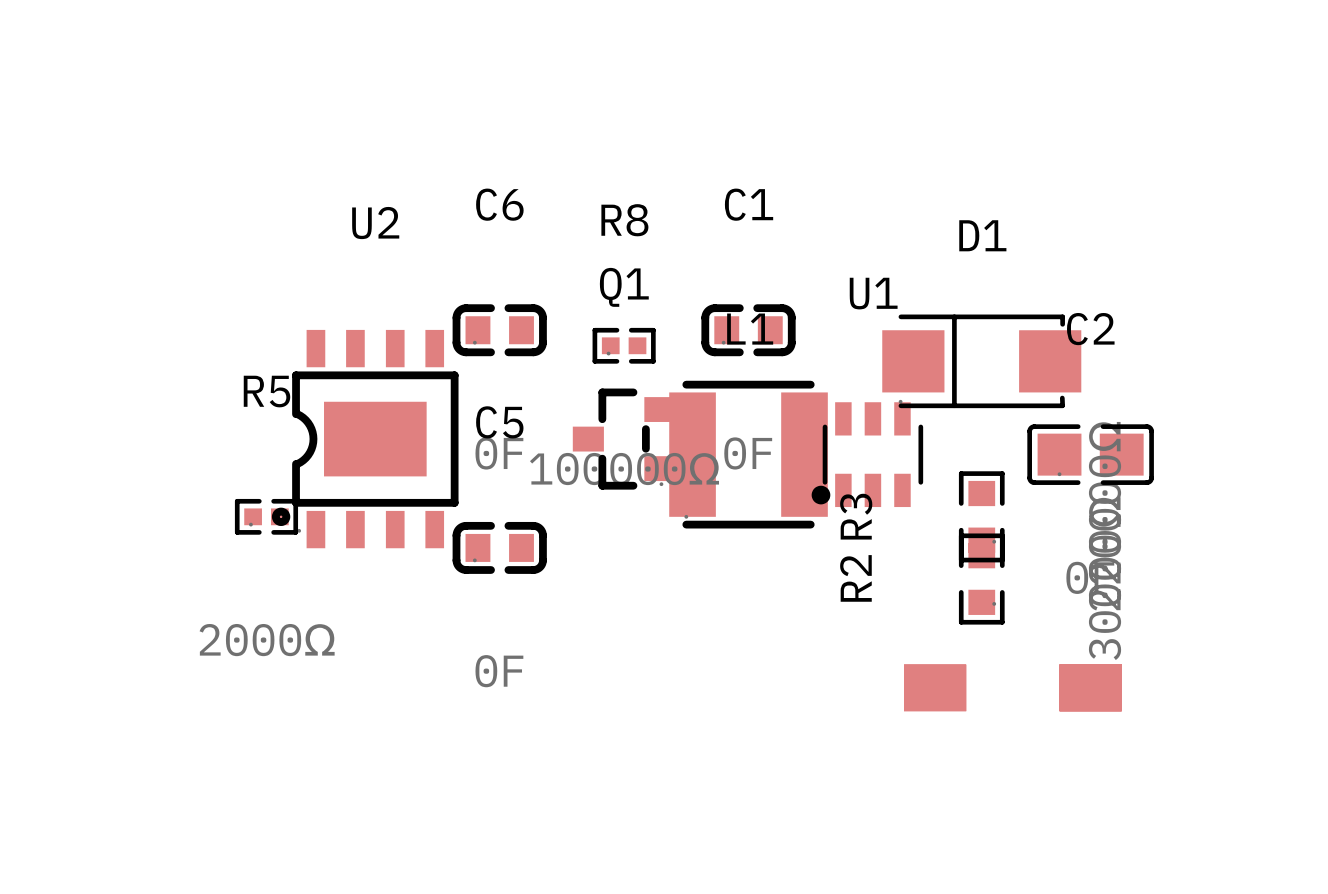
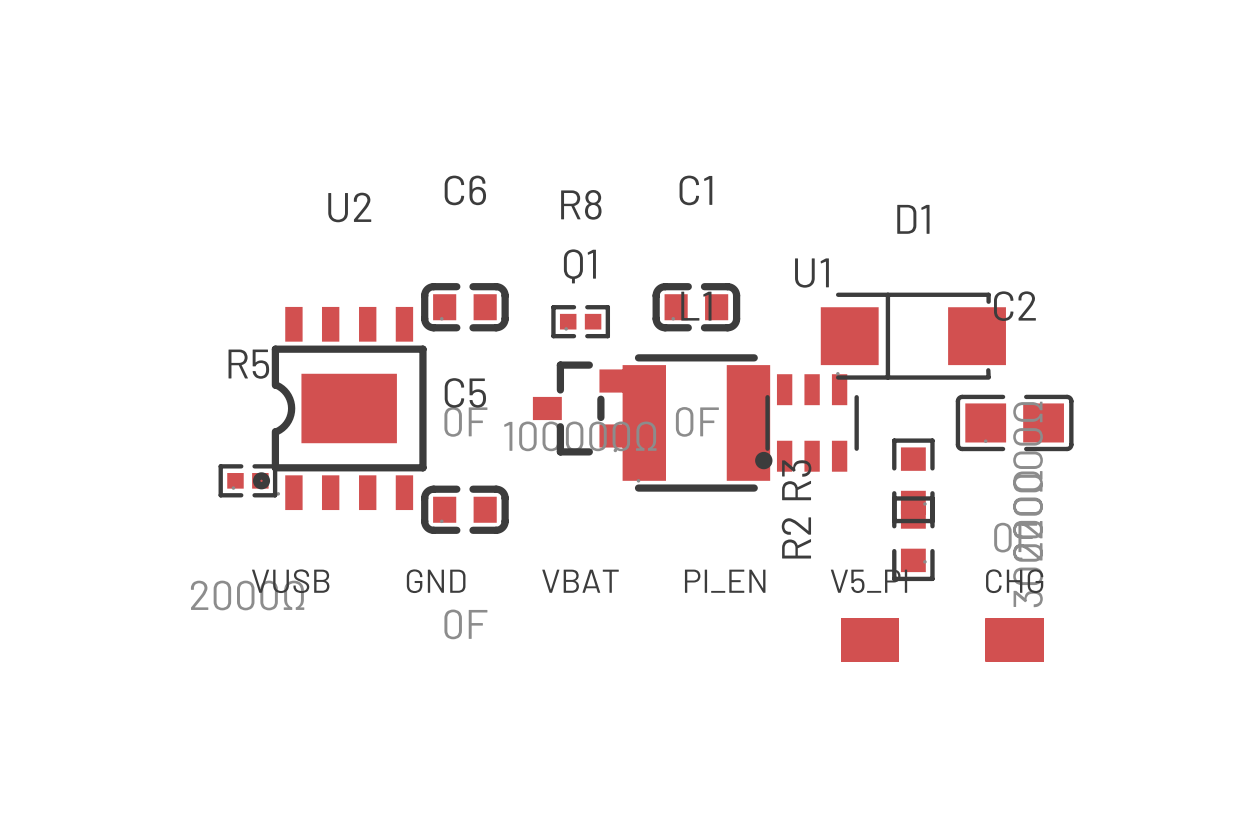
text: none -> VUSB (290, 581)
text: none -> GND (436, 581)
text: none -> VBAT (580, 581)
text: none -> CHG (1014, 581)
text: none -> PI_EN (725, 581)
text: none -> V5_PI (869, 581)

